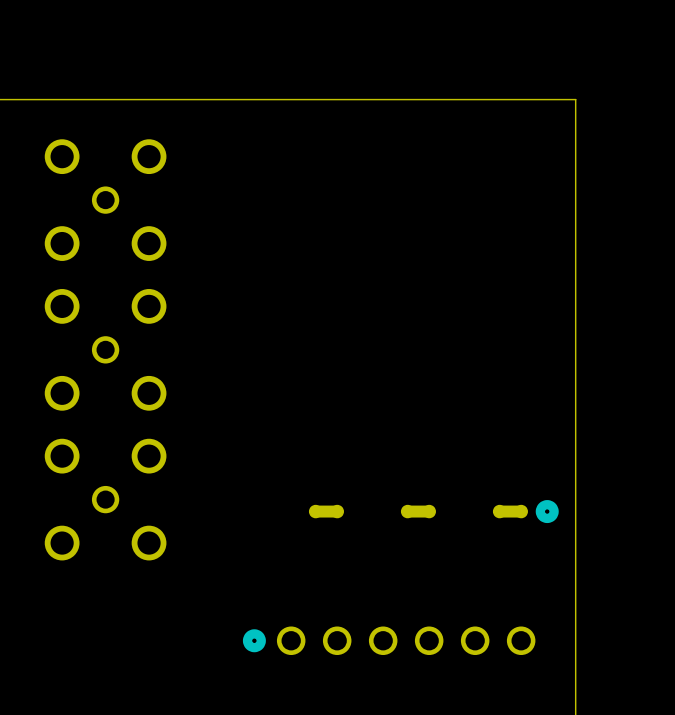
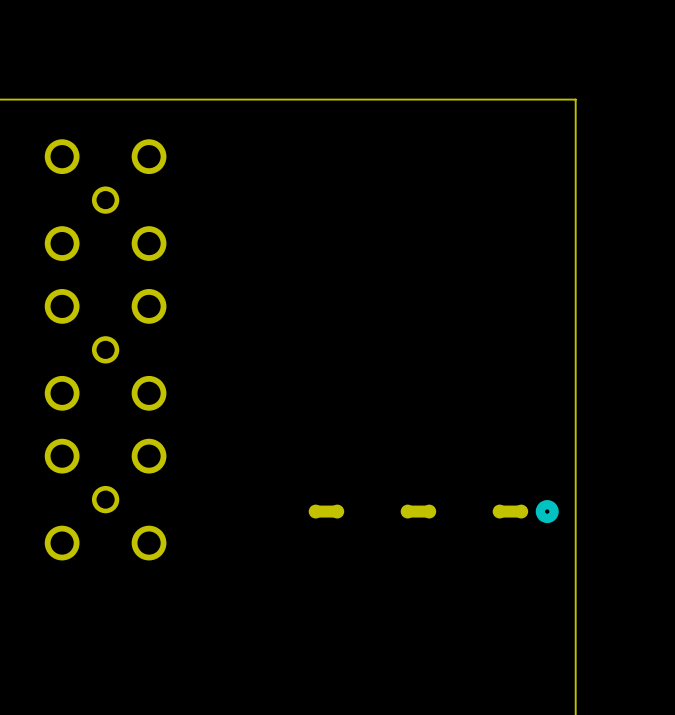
part: (389, 640) -> none

